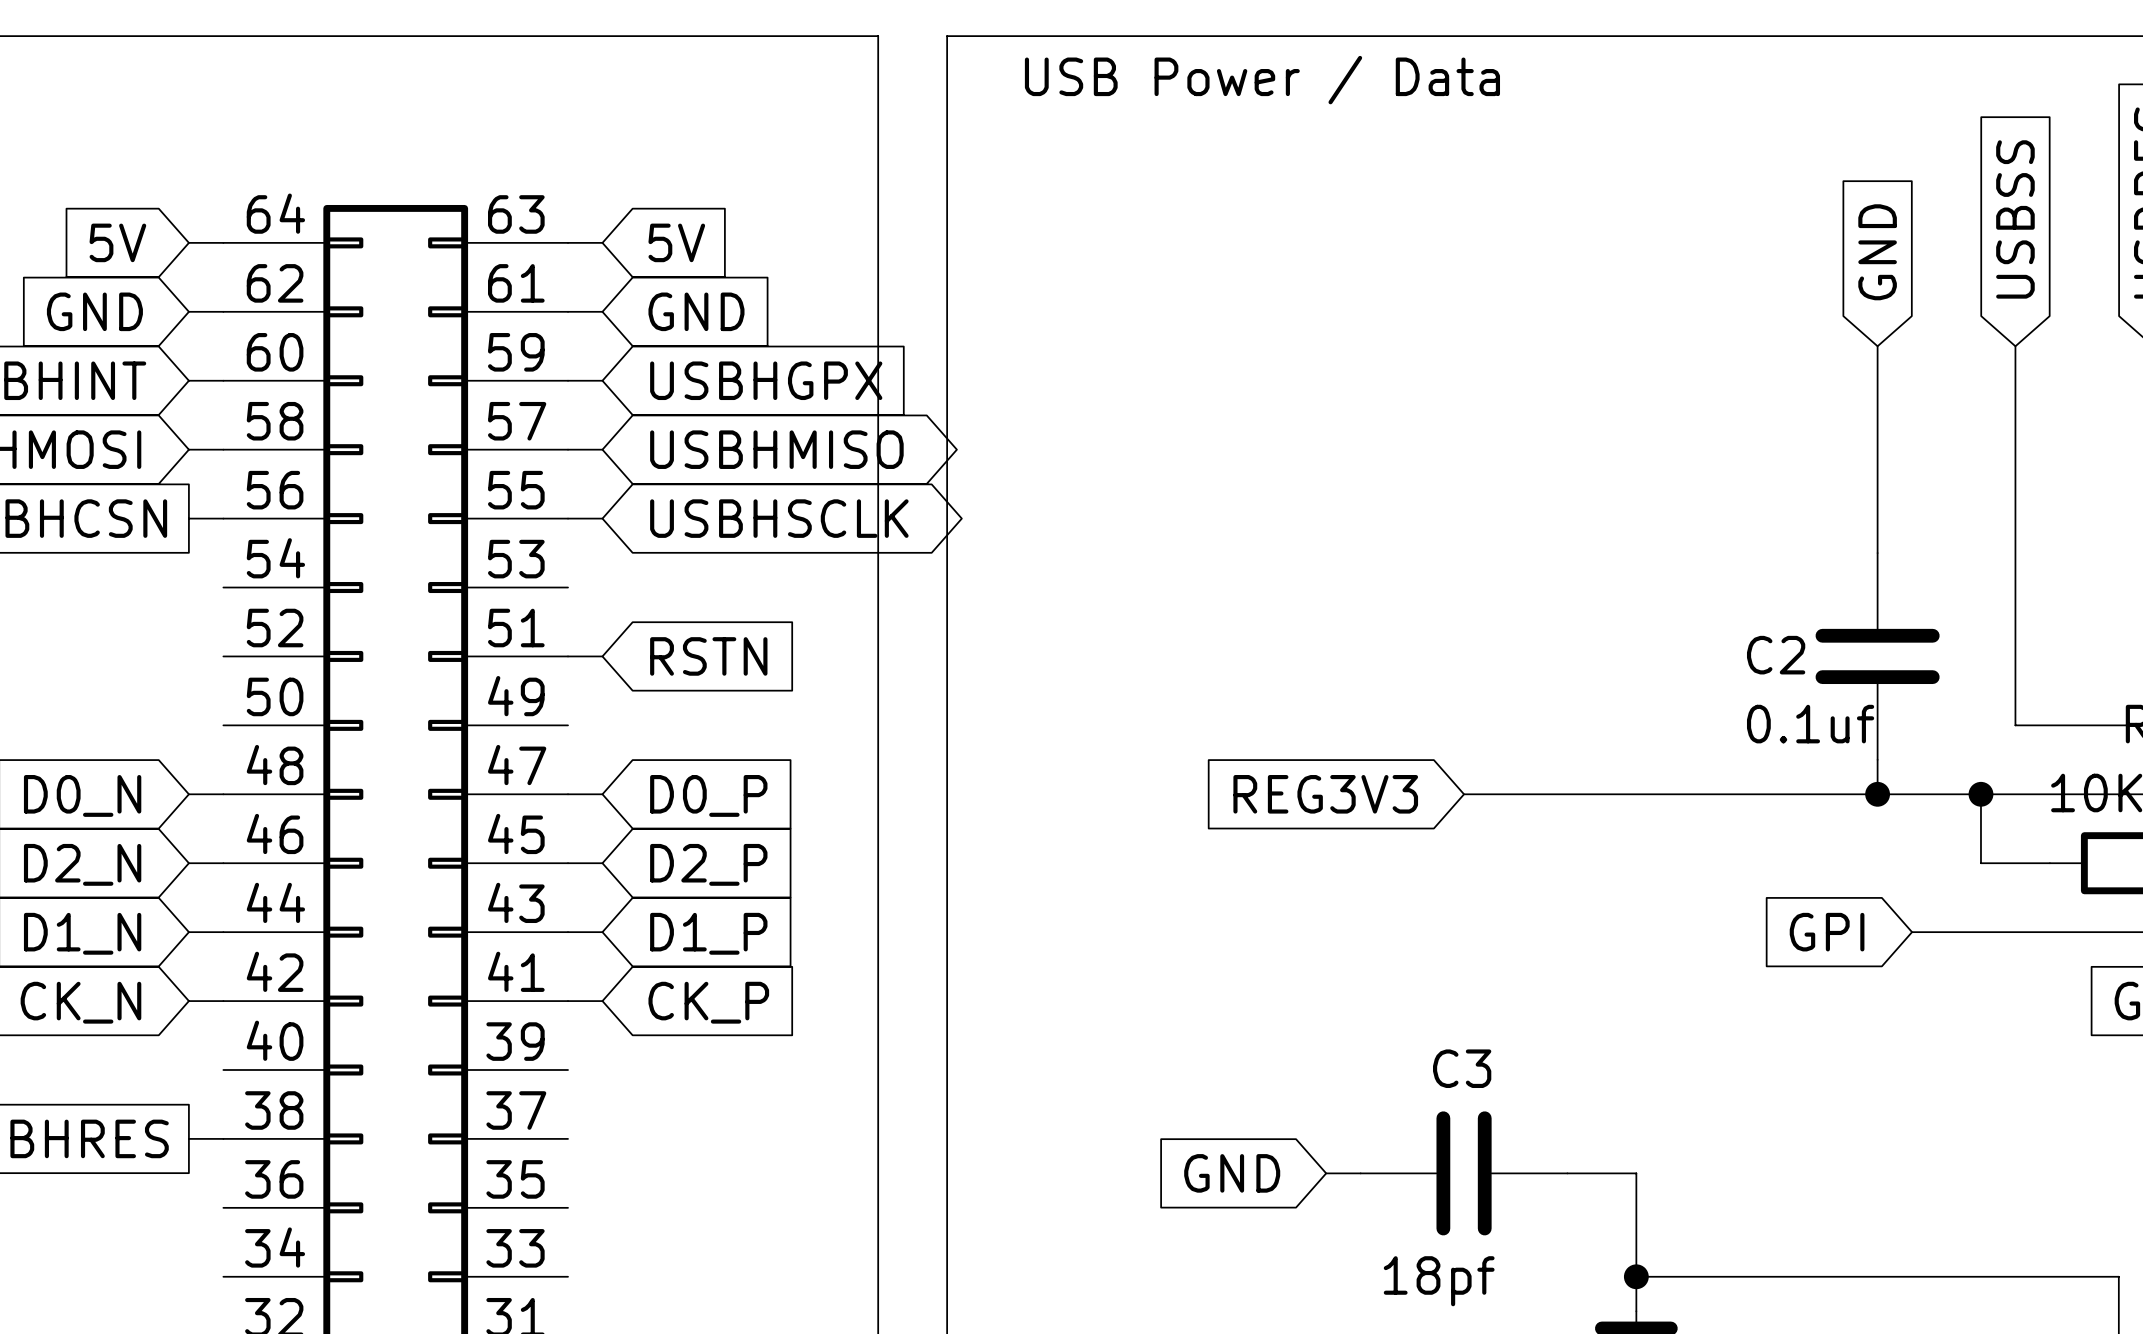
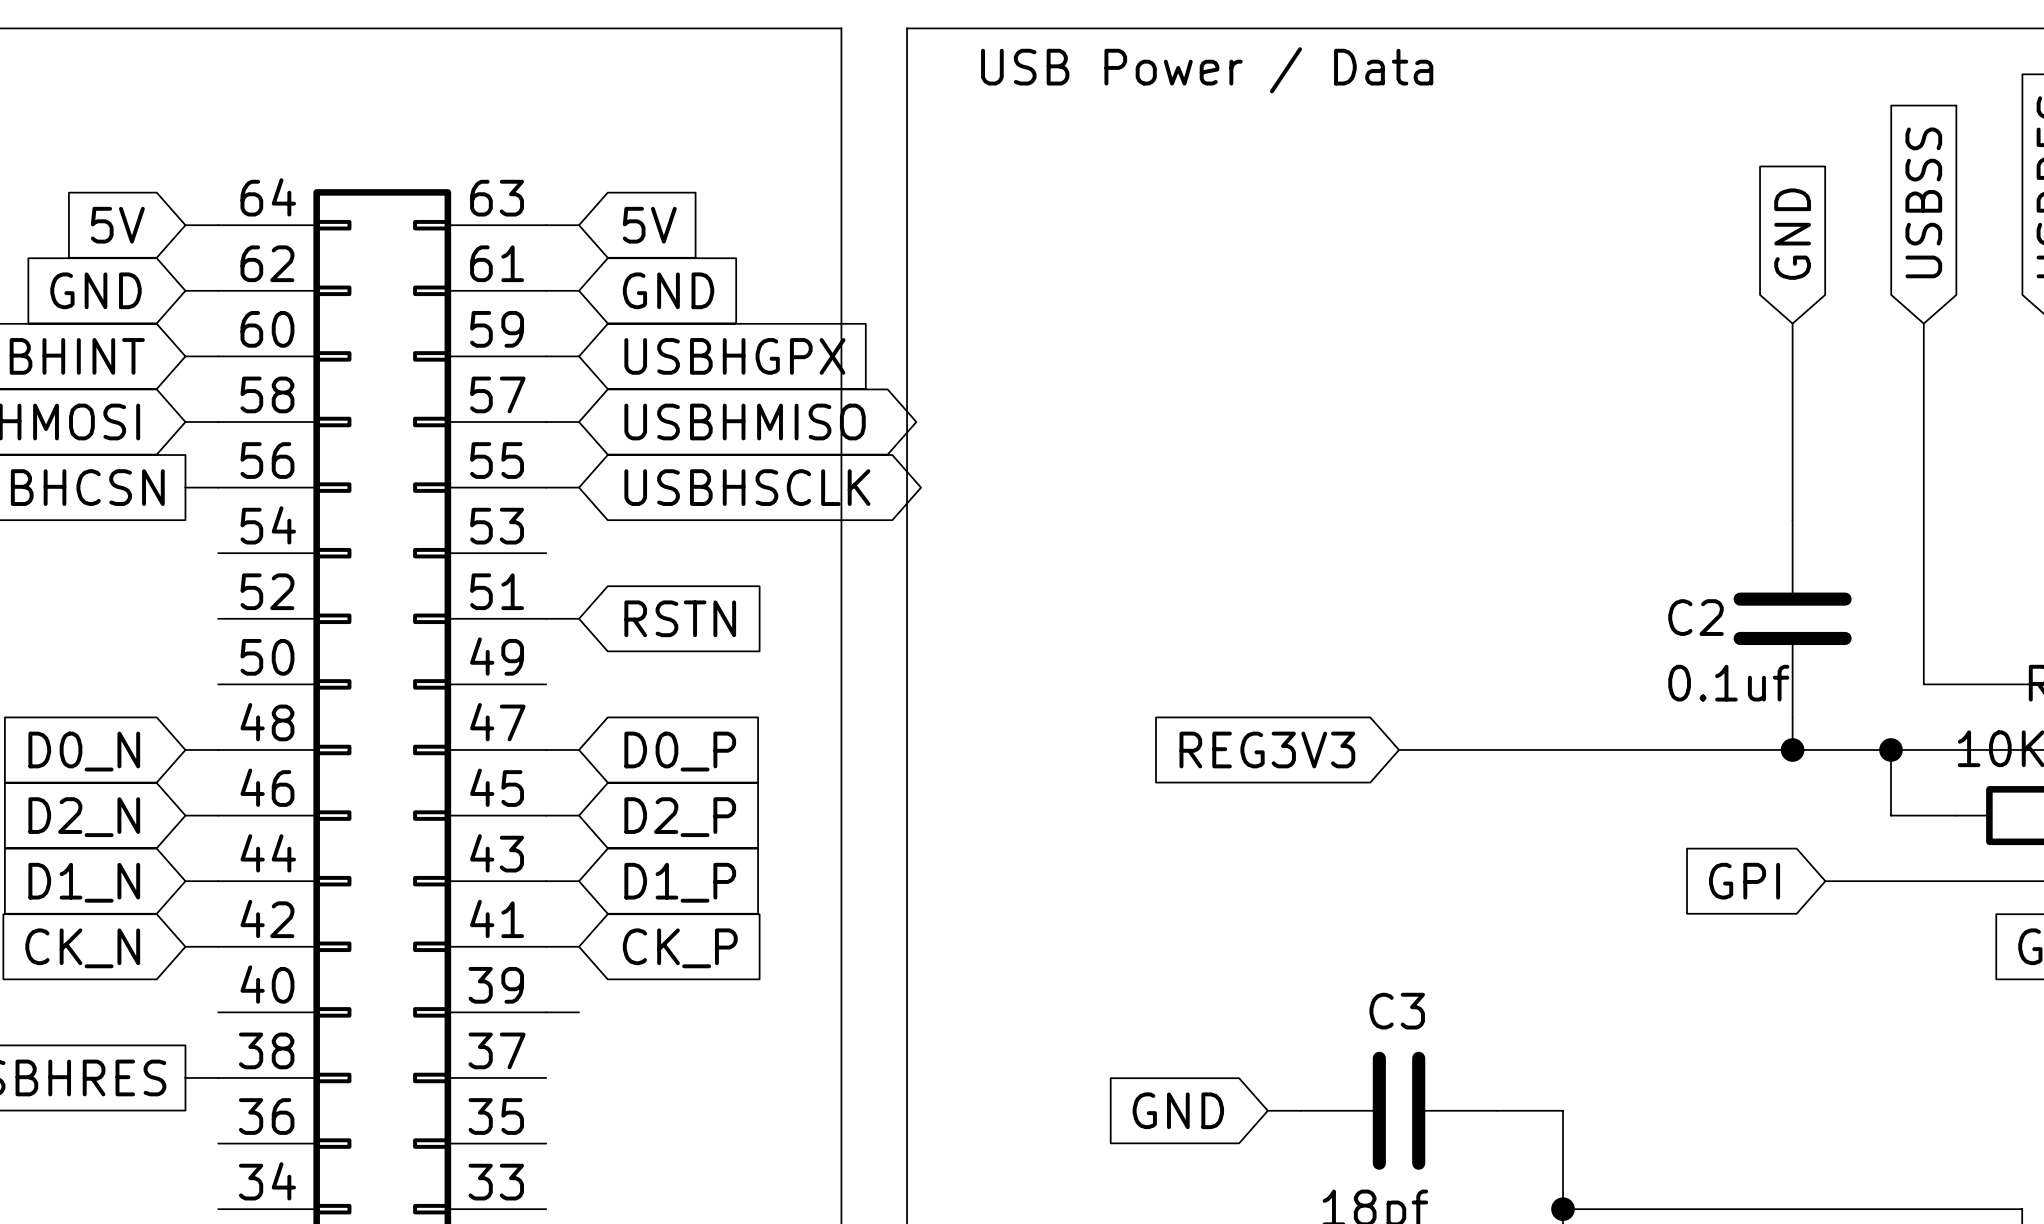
wire: none -> (546, 1012) (579, 1012)

